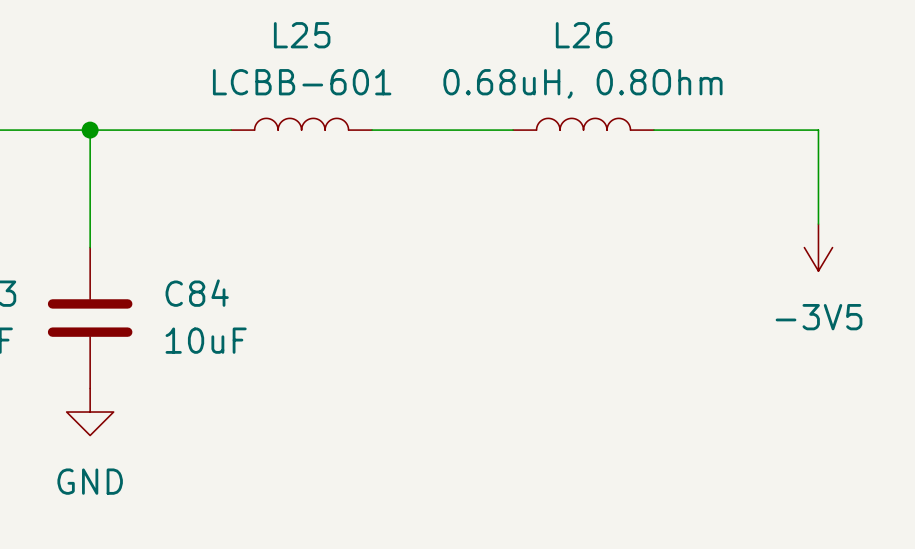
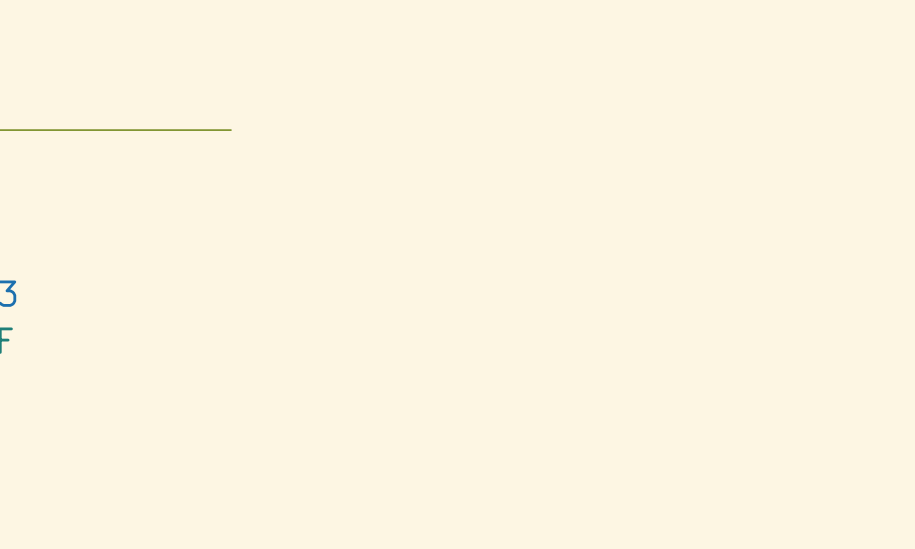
L25: LCBB-601 (301, 124) -> none
L26: 0.68uH, 0.8Ohm (583, 124) -> none
wire: (90, 130) (90, 247) -> none
junction: (90, 130) -> none
wire: (372, 130) (513, 130) -> none
wire: (654, 130) (818, 130) (818, 224) -> none
power symbol: -3V5 (818, 247) -> none
C84: 10uF (90, 318) -> none
power symbol: GND (90, 412) -> none

